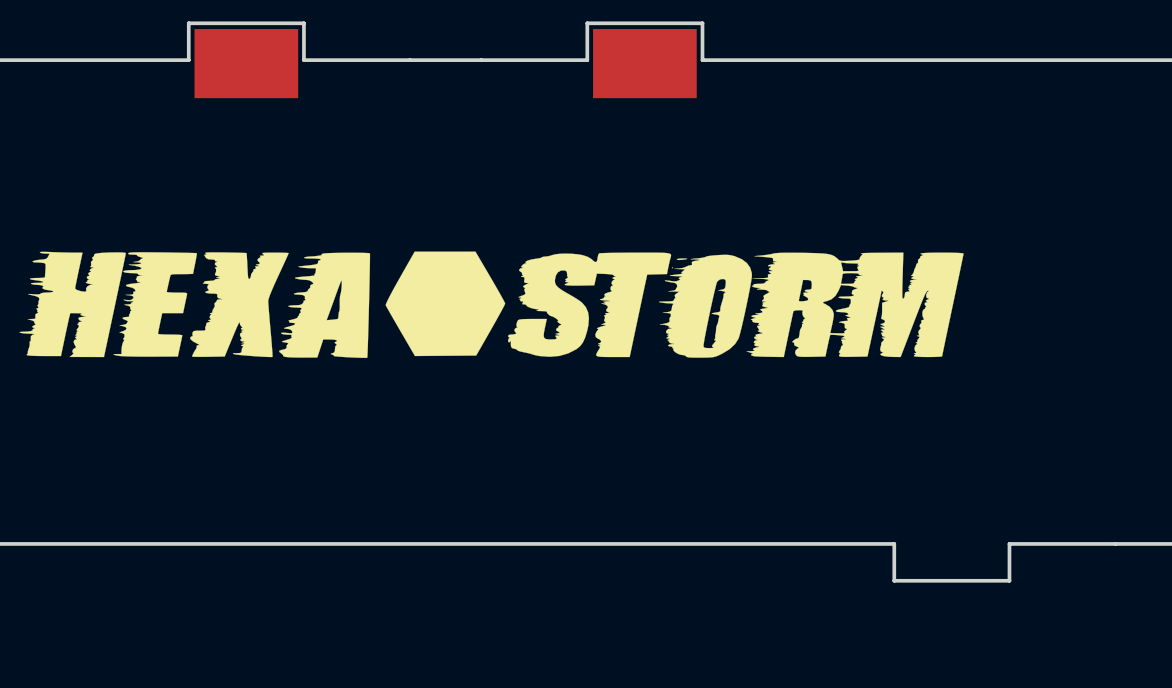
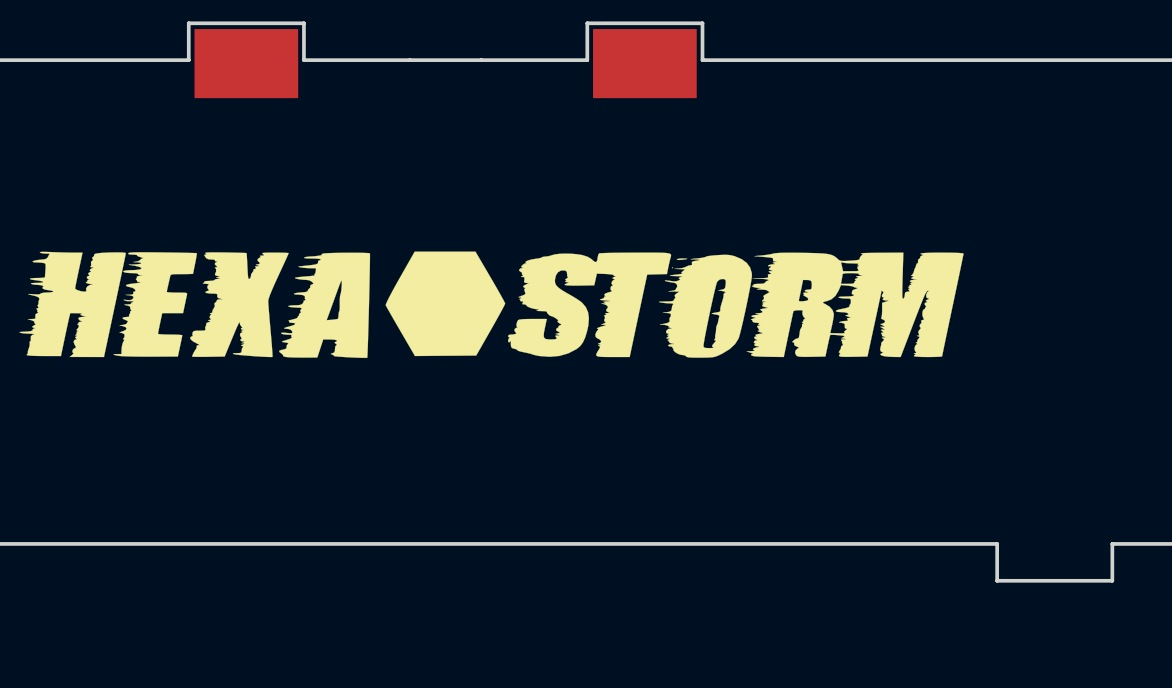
board edge: (894, 543) (894, 580) (997, 580) -> (894, 543) (997, 543) (997, 580)
board edge: (1112, 543) (1009, 543) (1009, 580) -> (1112, 543) (1112, 580) (1009, 580)

